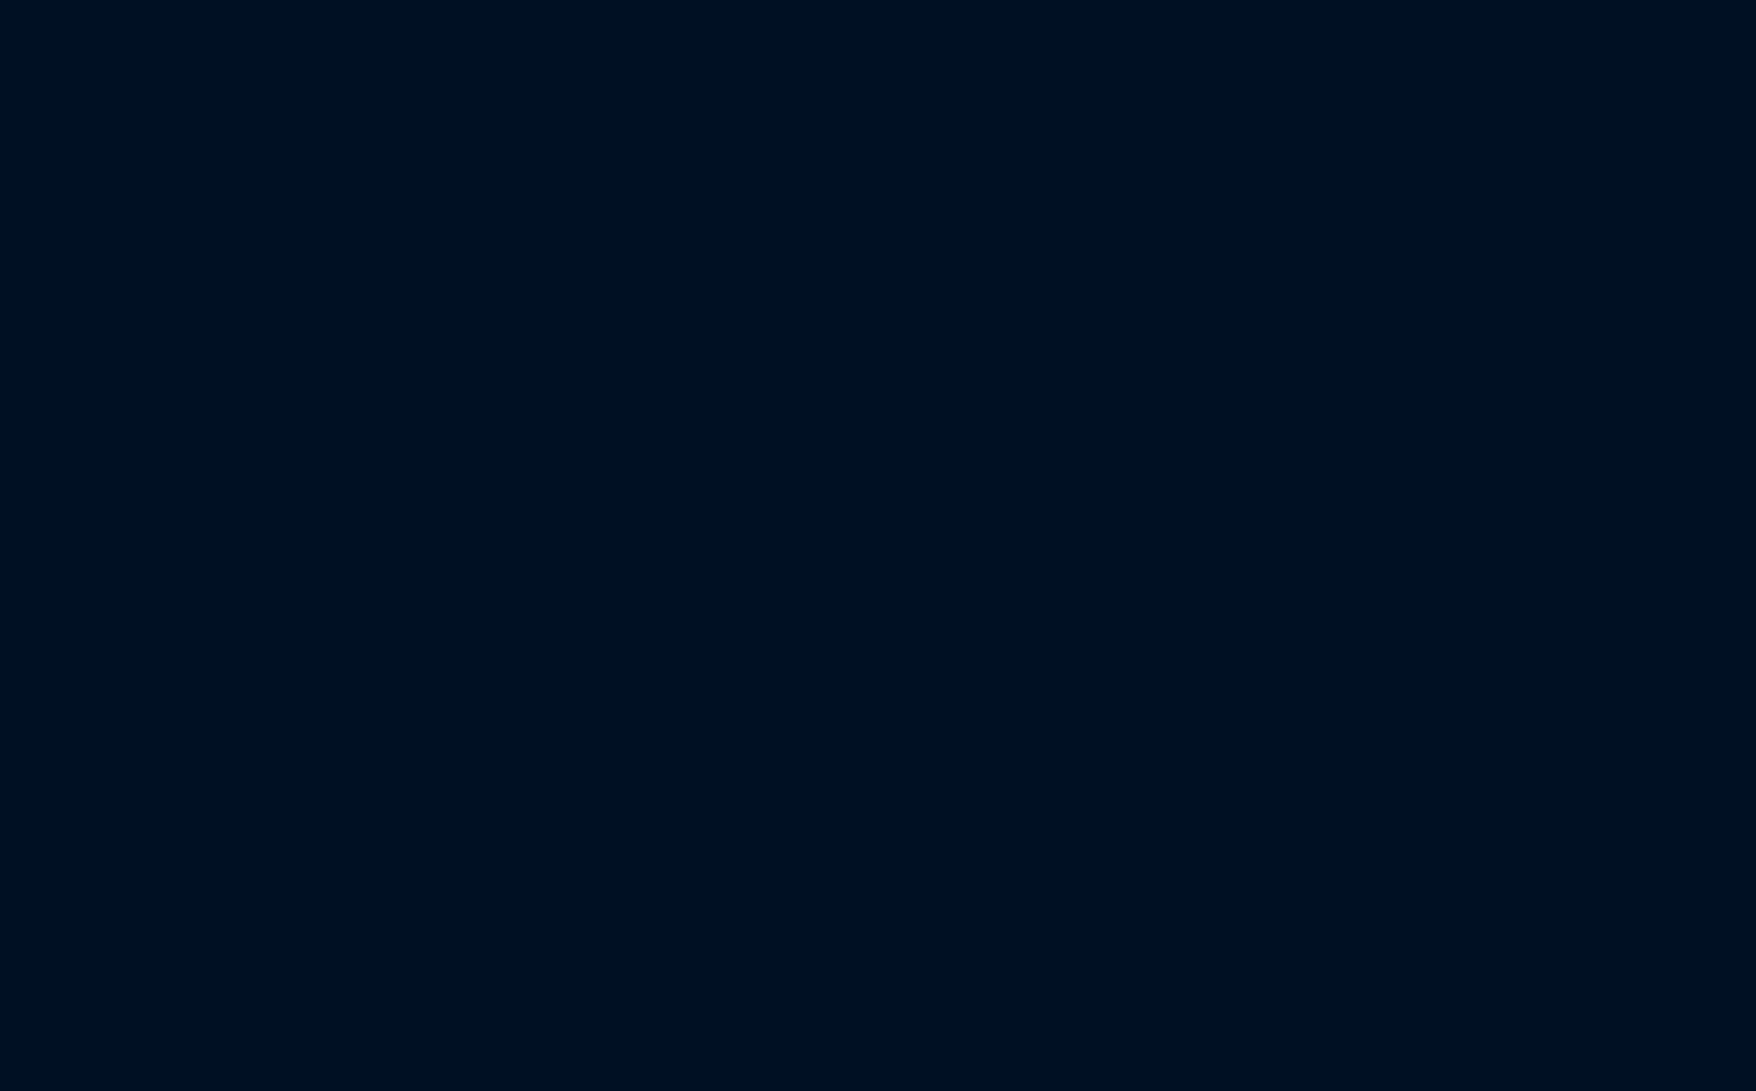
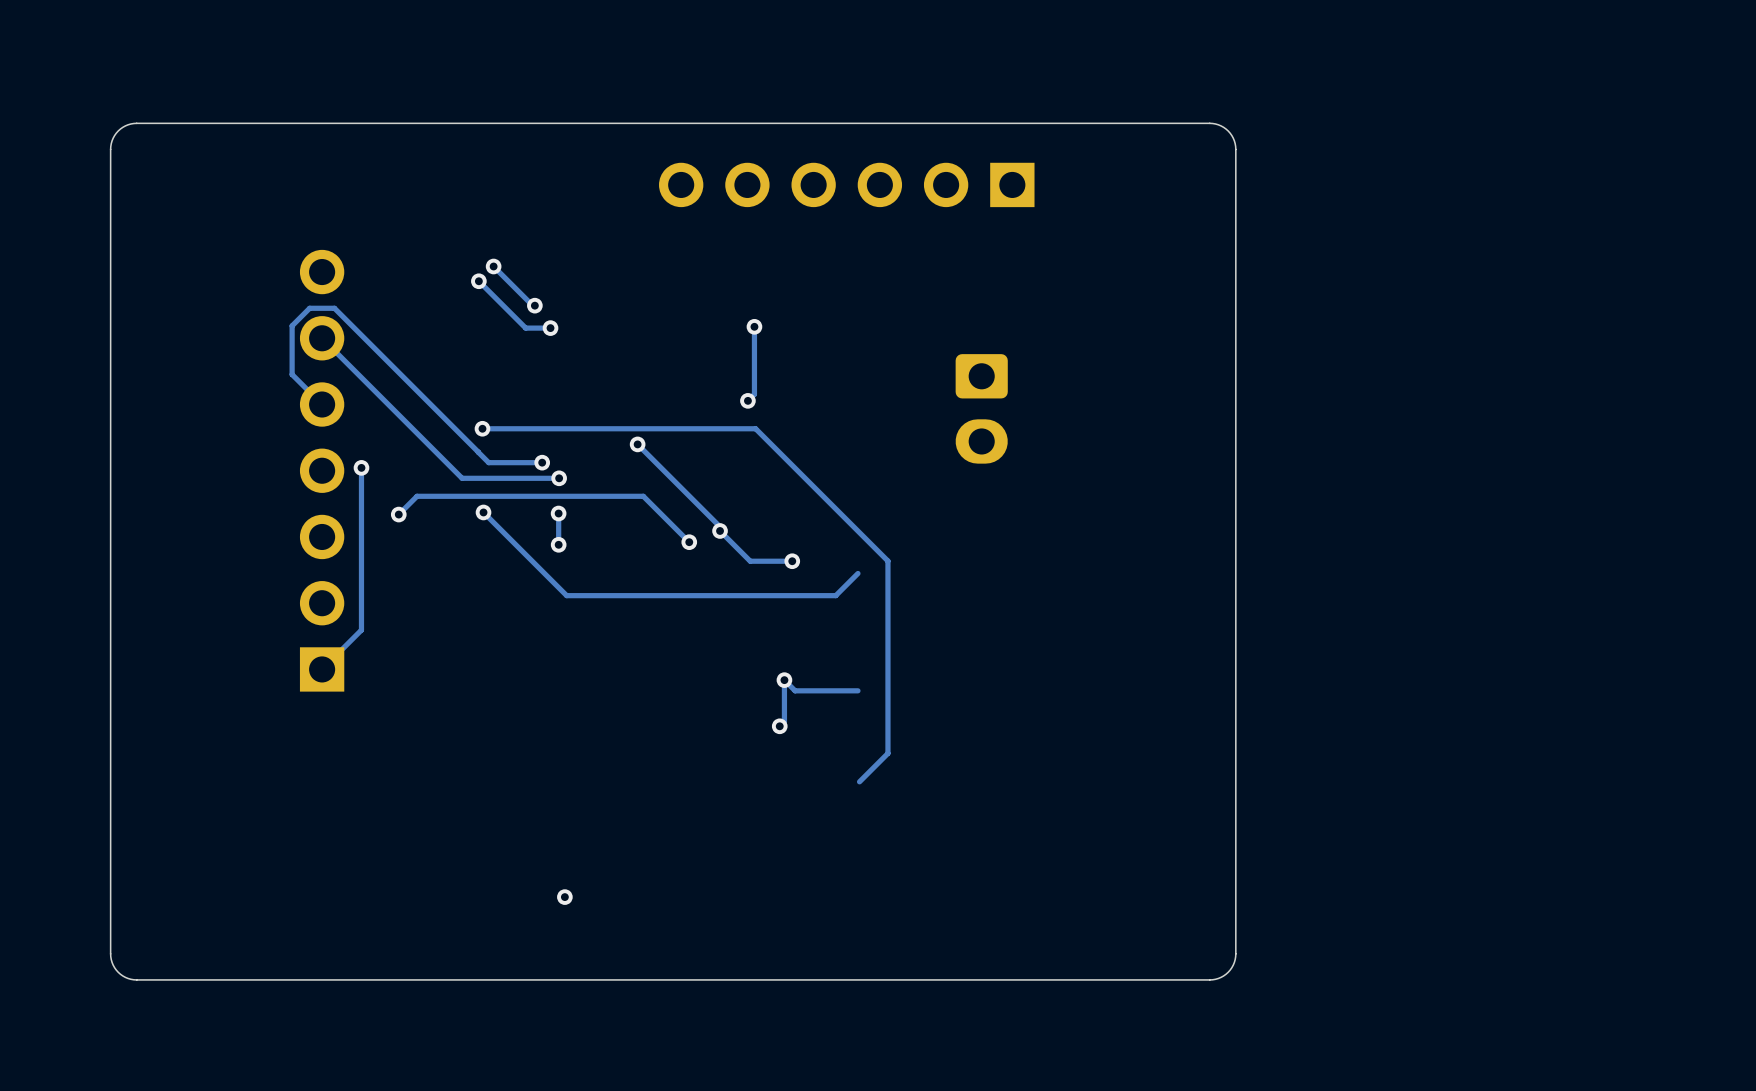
board edge: none -> (1209, 123) (136, 123) (120, 129) (113, 138) (110, 149) (110, 953) (116, 970) (125, 977) (136, 979) (1209, 979) (1226, 974) (1233, 965) (1235, 953) (1235, 149) (1234, 140) (1228, 130) (1221, 125) (1209, 123)
part: none -> (846, 184)
track: none -> (493, 266) (534, 305)
via: none -> (493, 266)
track: none -> (478, 281) (525, 328) (550, 328)
via: none -> (478, 281)
via: none -> (534, 305)
track: none -> (754, 326) (754, 394) (747, 400)
via: none -> (754, 326)
via: none -> (550, 328)
track: none -> (322, 338) (462, 478) (559, 478)
via: none -> (747, 400)
track: none -> (322, 404) (292, 374) (292, 325) (309, 308) (334, 308) (478, 452)
part: none -> (981, 408)
track: none -> (482, 428) (755, 428) (887, 561) (887, 753) (859, 781)
via: none -> (482, 428)
track: none -> (637, 444) (720, 526) (720, 530) (750, 561) (792, 561)
via: none -> (637, 444)
track: none -> (478, 452) (488, 462) (542, 462)
via: none -> (542, 462)
track: none -> (361, 467) (361, 630) (322, 669)
via: none -> (361, 467)
part: none -> (322, 470)
via: none -> (559, 478)
track: none -> (483, 512) (566, 595) (835, 595) (857, 573)
via: none -> (483, 512)
track: none -> (558, 513) (558, 544)
via: none -> (558, 513)
track: none -> (398, 514) (417, 496) (643, 496) (689, 542)
via: none -> (398, 514)
via: none -> (720, 530)
via: none -> (689, 542)
via: none -> (558, 544)
via: none -> (792, 561)
via: none -> (784, 680)
track: none -> (857, 690) (795, 690) (784, 680) (784, 721) (779, 726)
via: none -> (779, 726)
via: none -> (564, 897)

